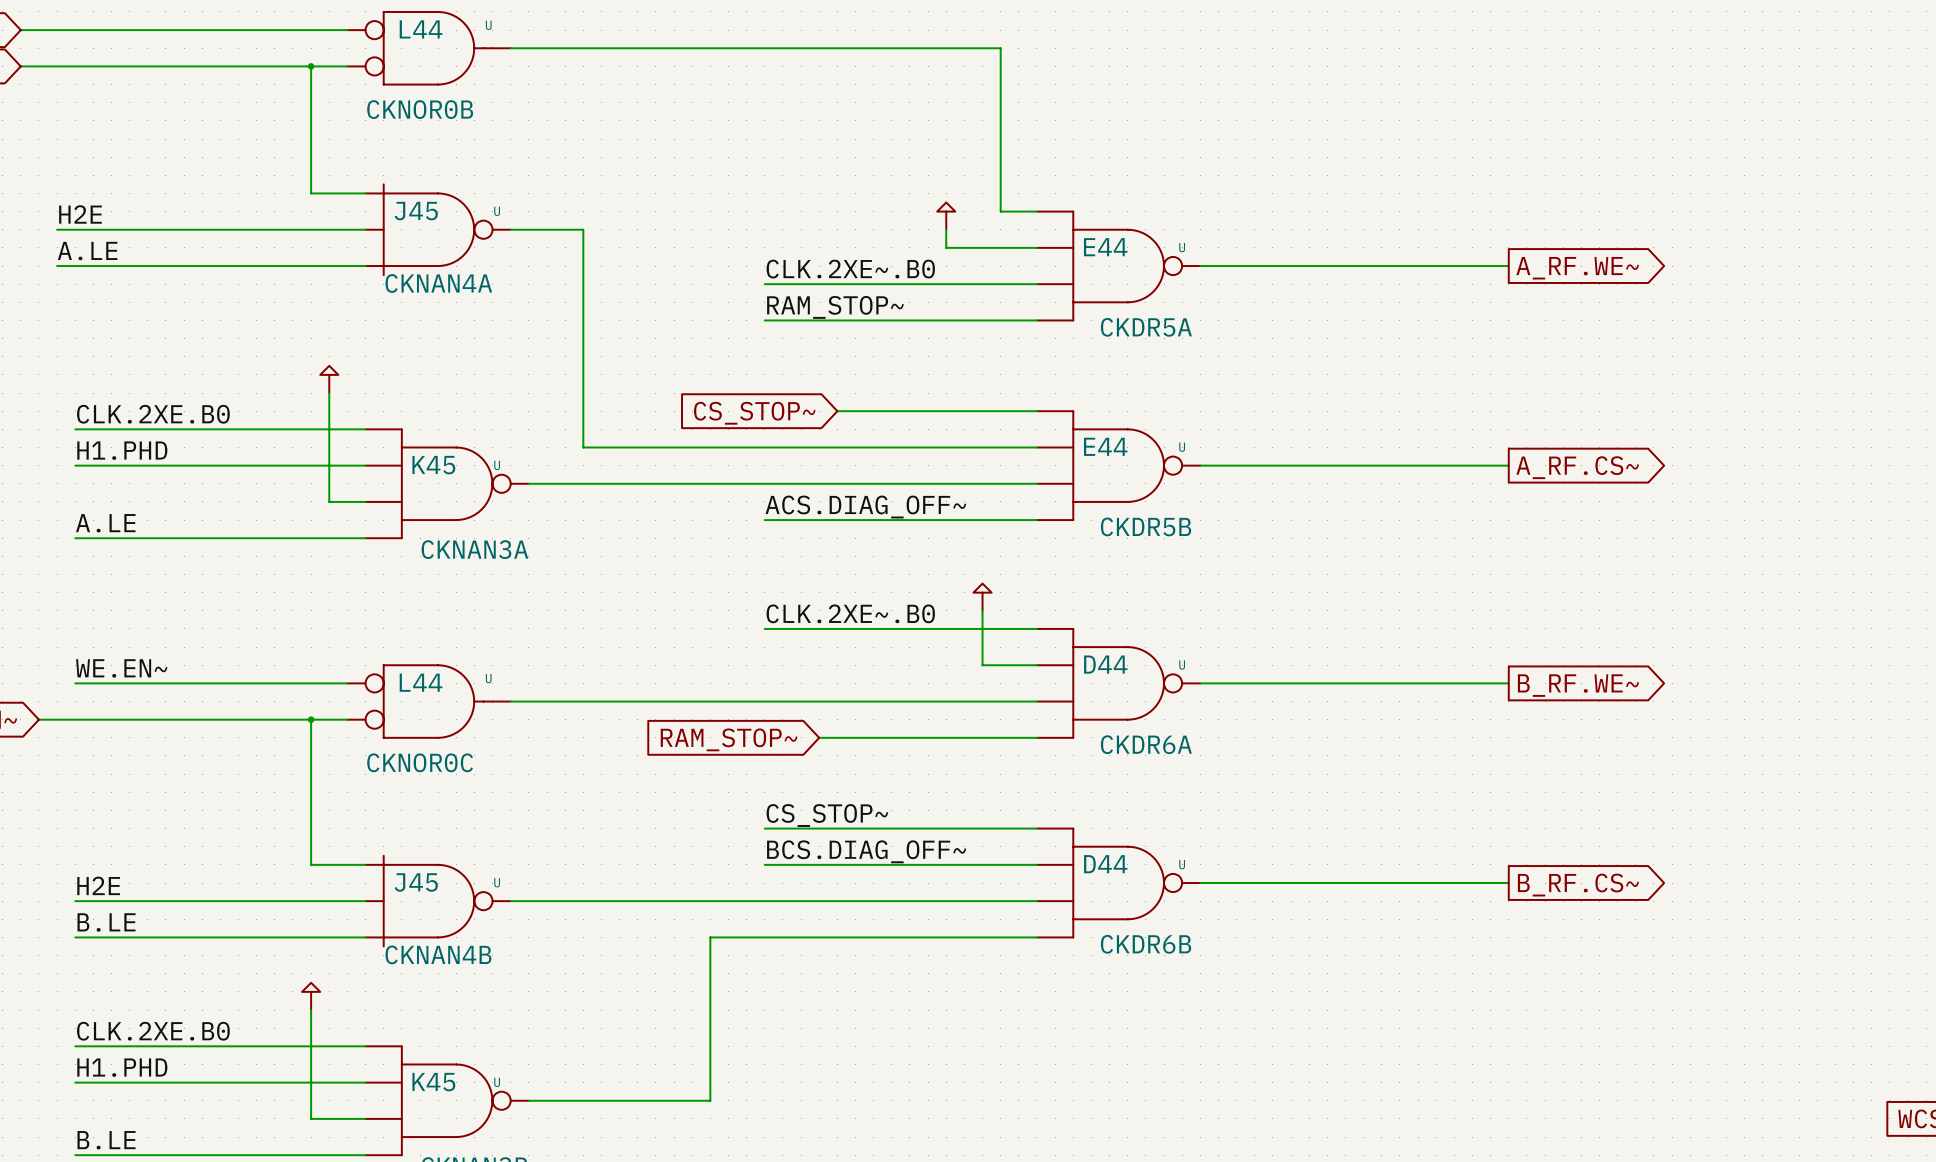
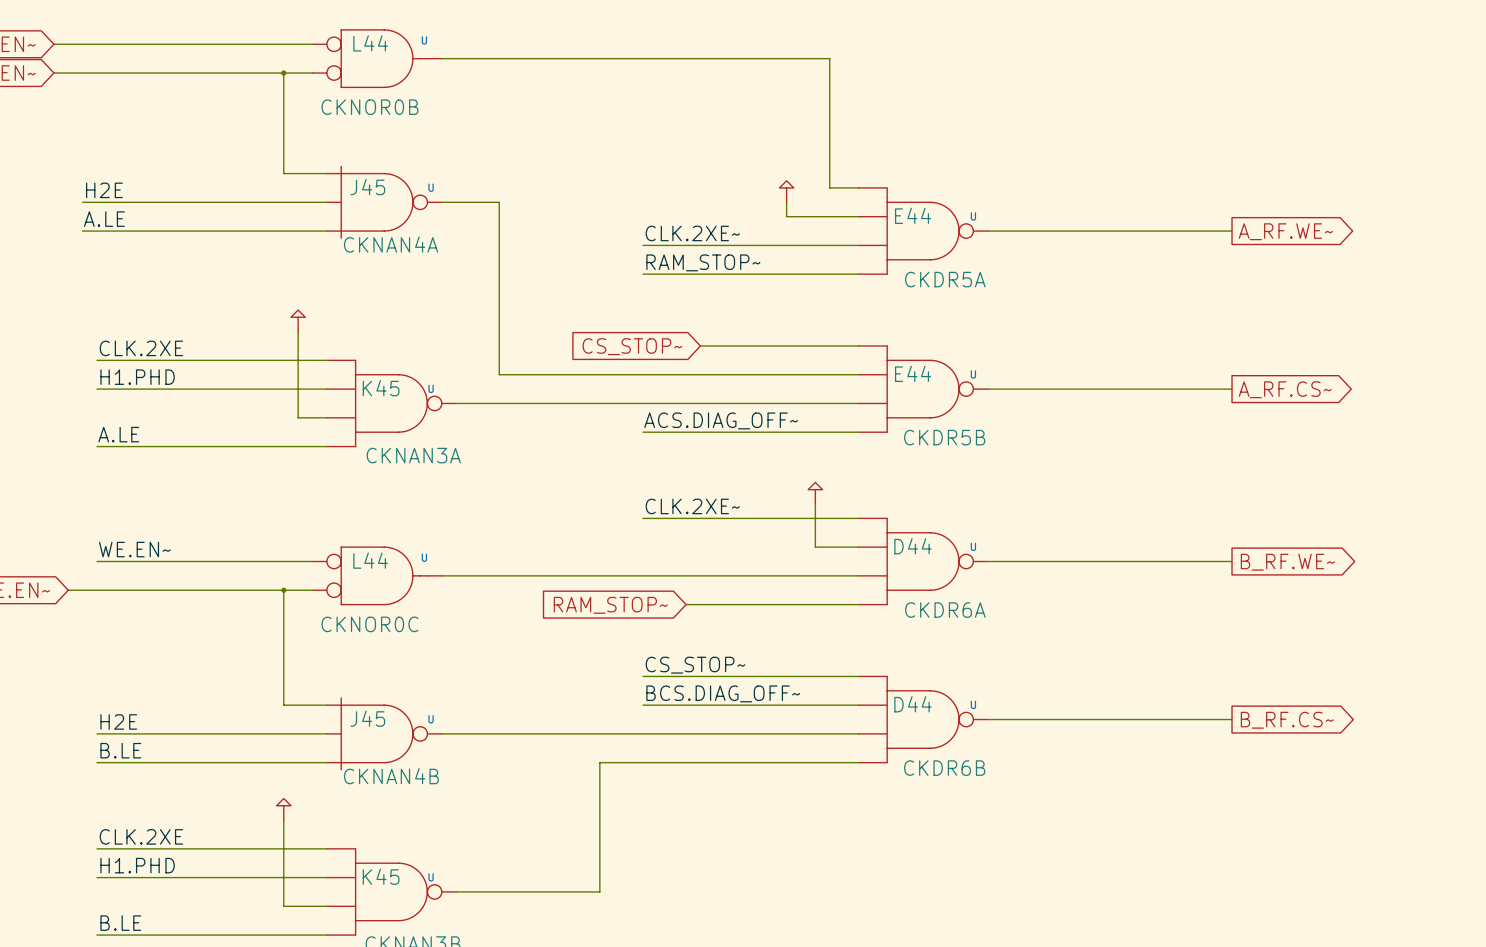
label: CLK.2XE~.B0 (850, 269) -> CLK.2XE~ (692, 233)
label: CLK.2XE.B0 (153, 414) -> CLK.2XE (141, 348)
label: CLK.2XE~.B0 (850, 613) -> CLK.2XE~ (692, 506)
label: CLK.2XE.B0 (153, 1031) -> CLK.2XE (141, 836)

